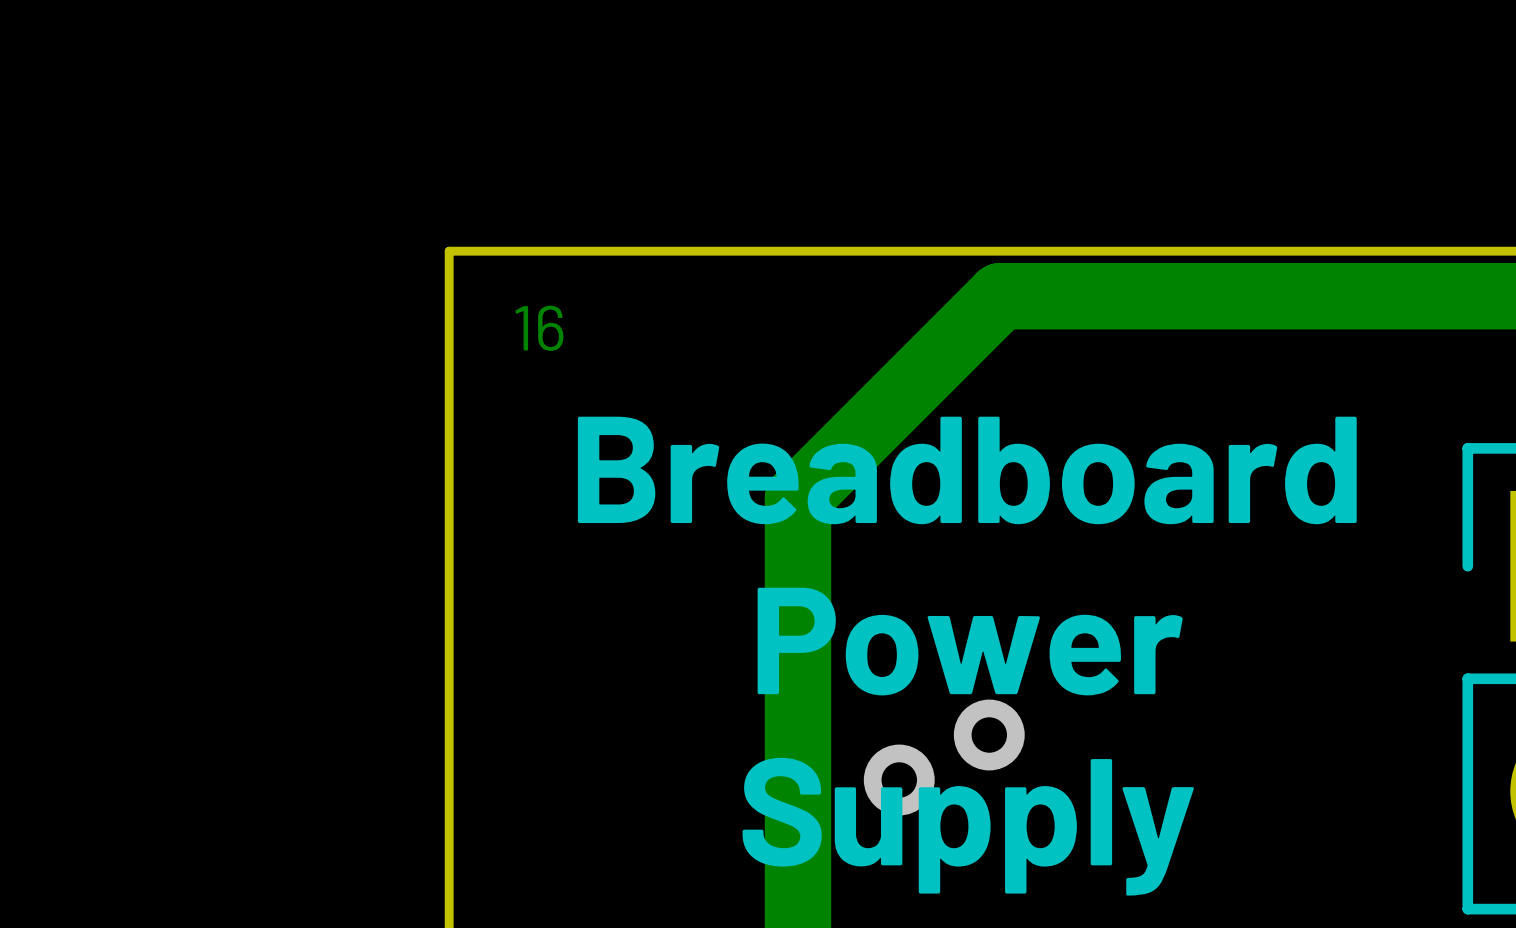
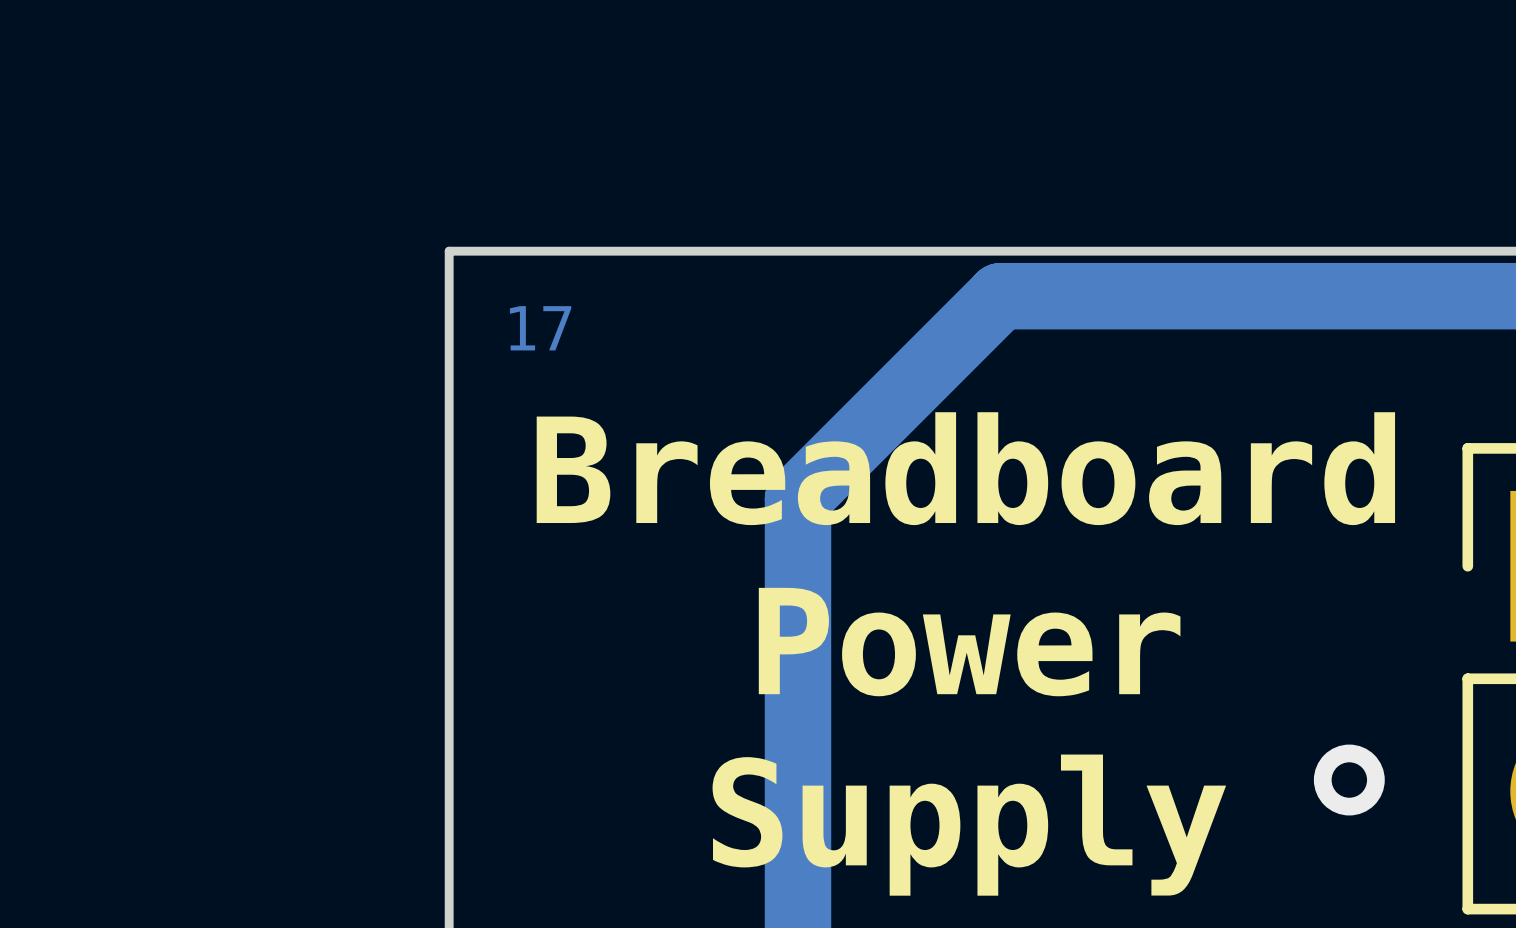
text: 16 (539, 328) -> 17 (540, 328)
via: (989, 735) -> none
via: (899, 780) -> none
via: none -> (1349, 780)

